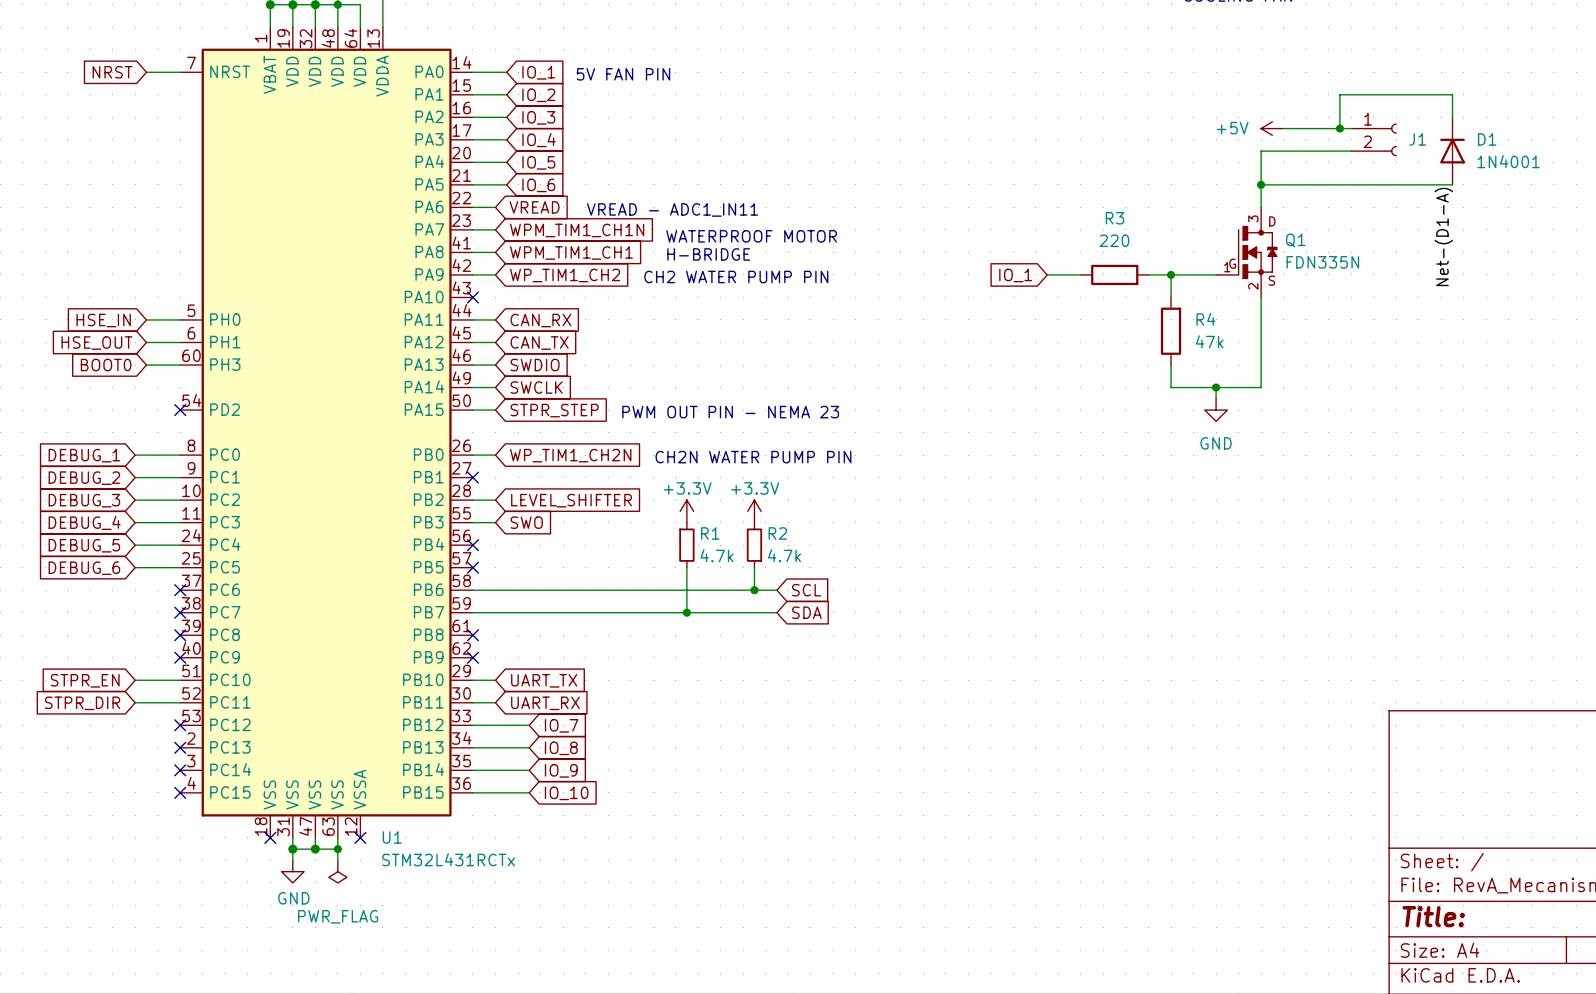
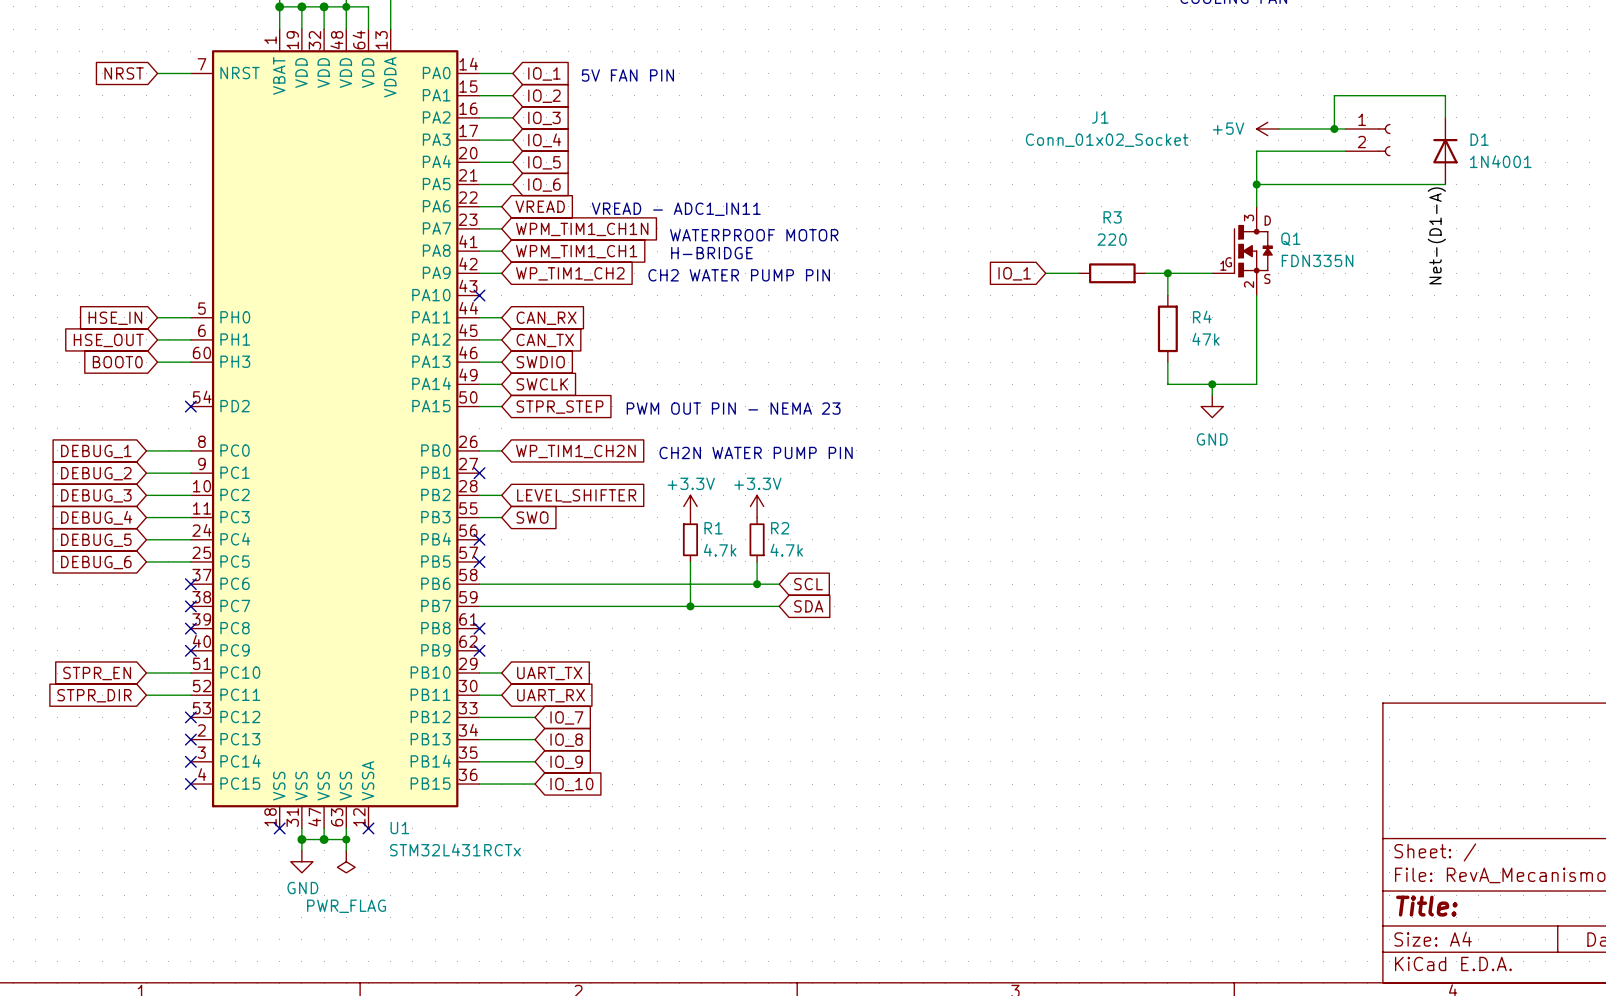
J1 value: none -> Conn_01x02_Socket (1107, 140)
J1 name position: J1 (1417, 139) -> J1 (1100, 117)

